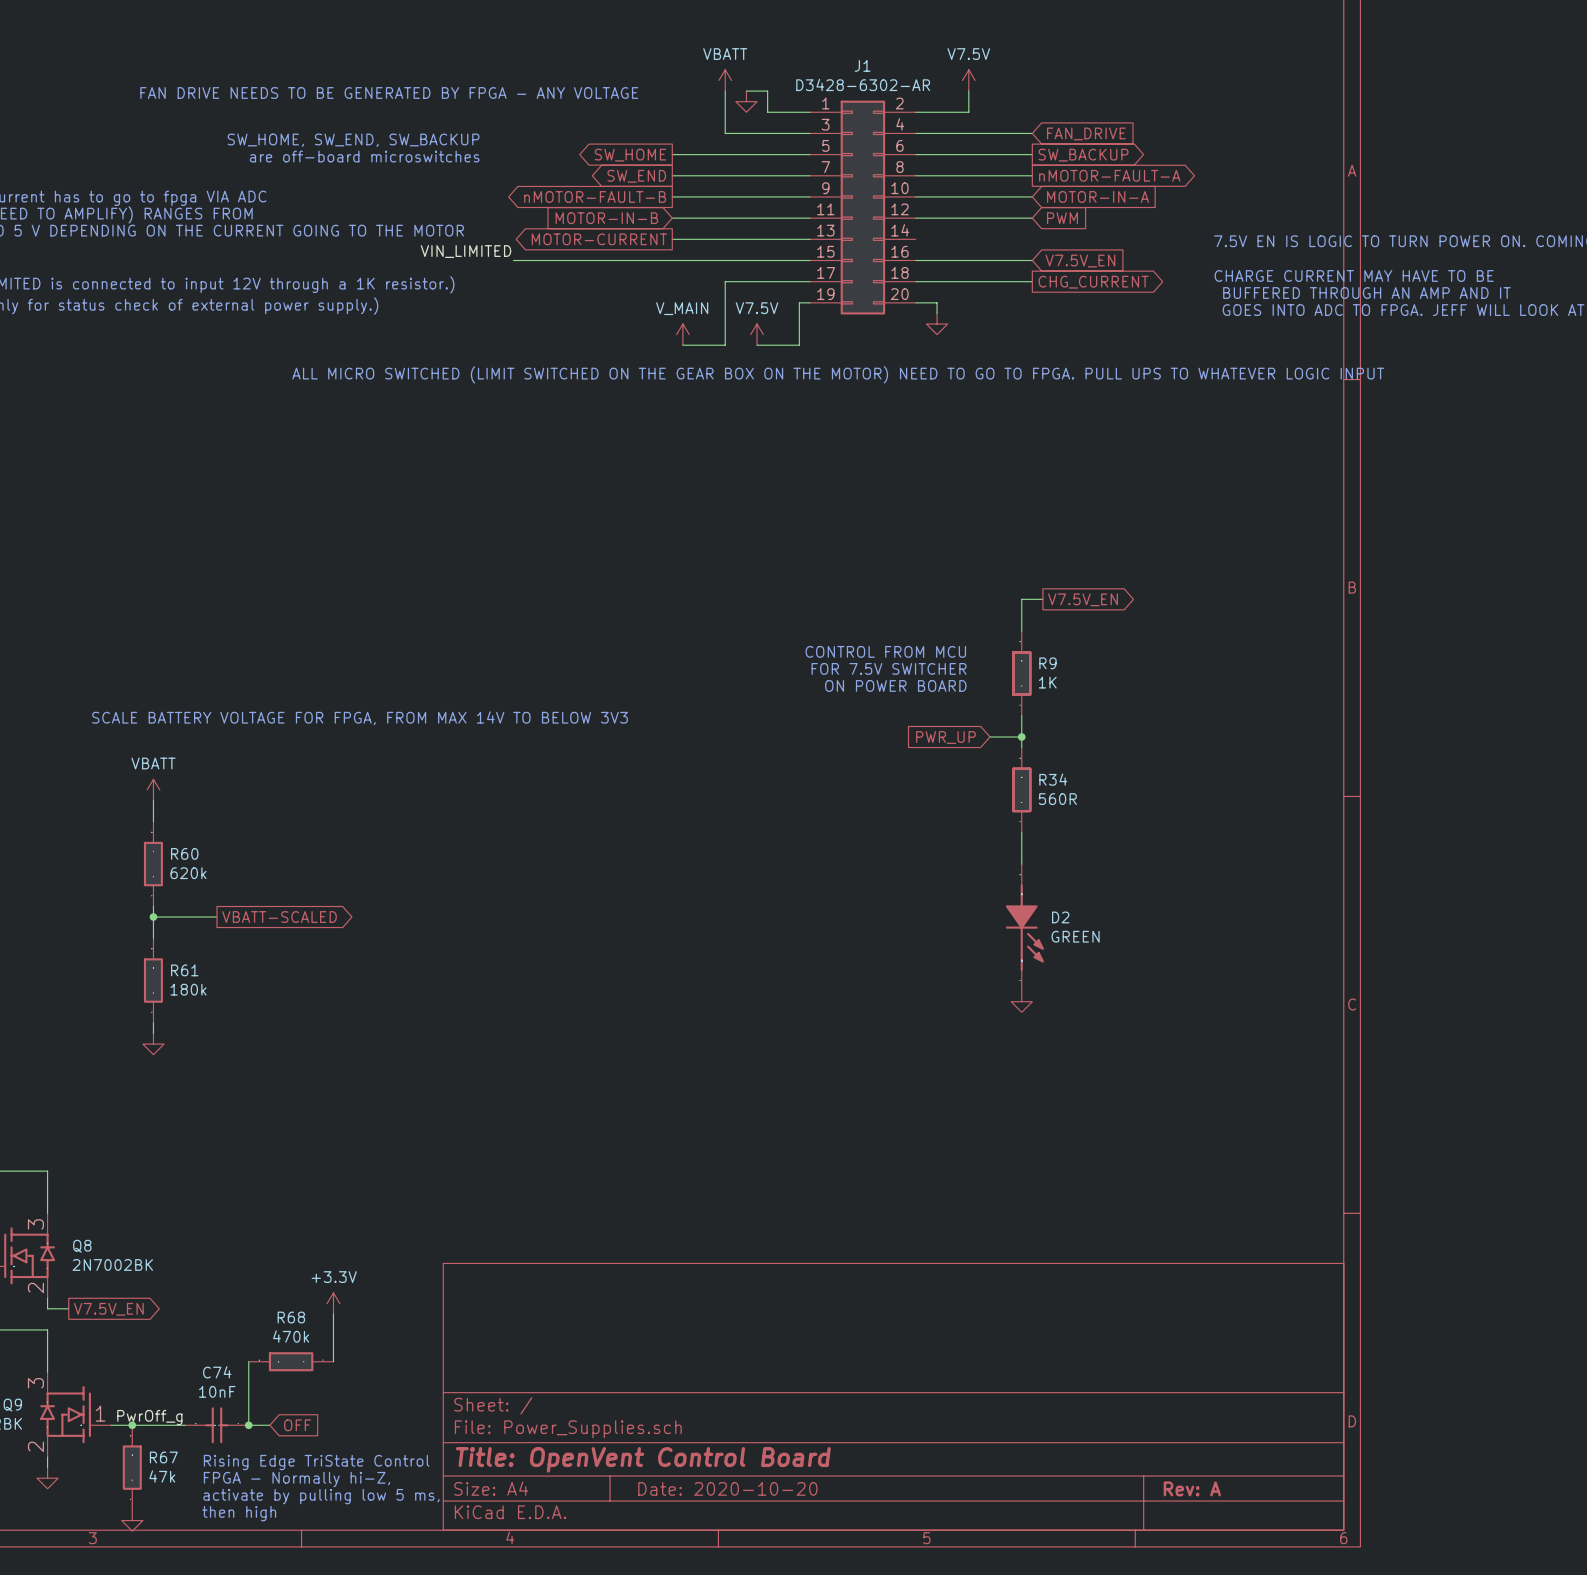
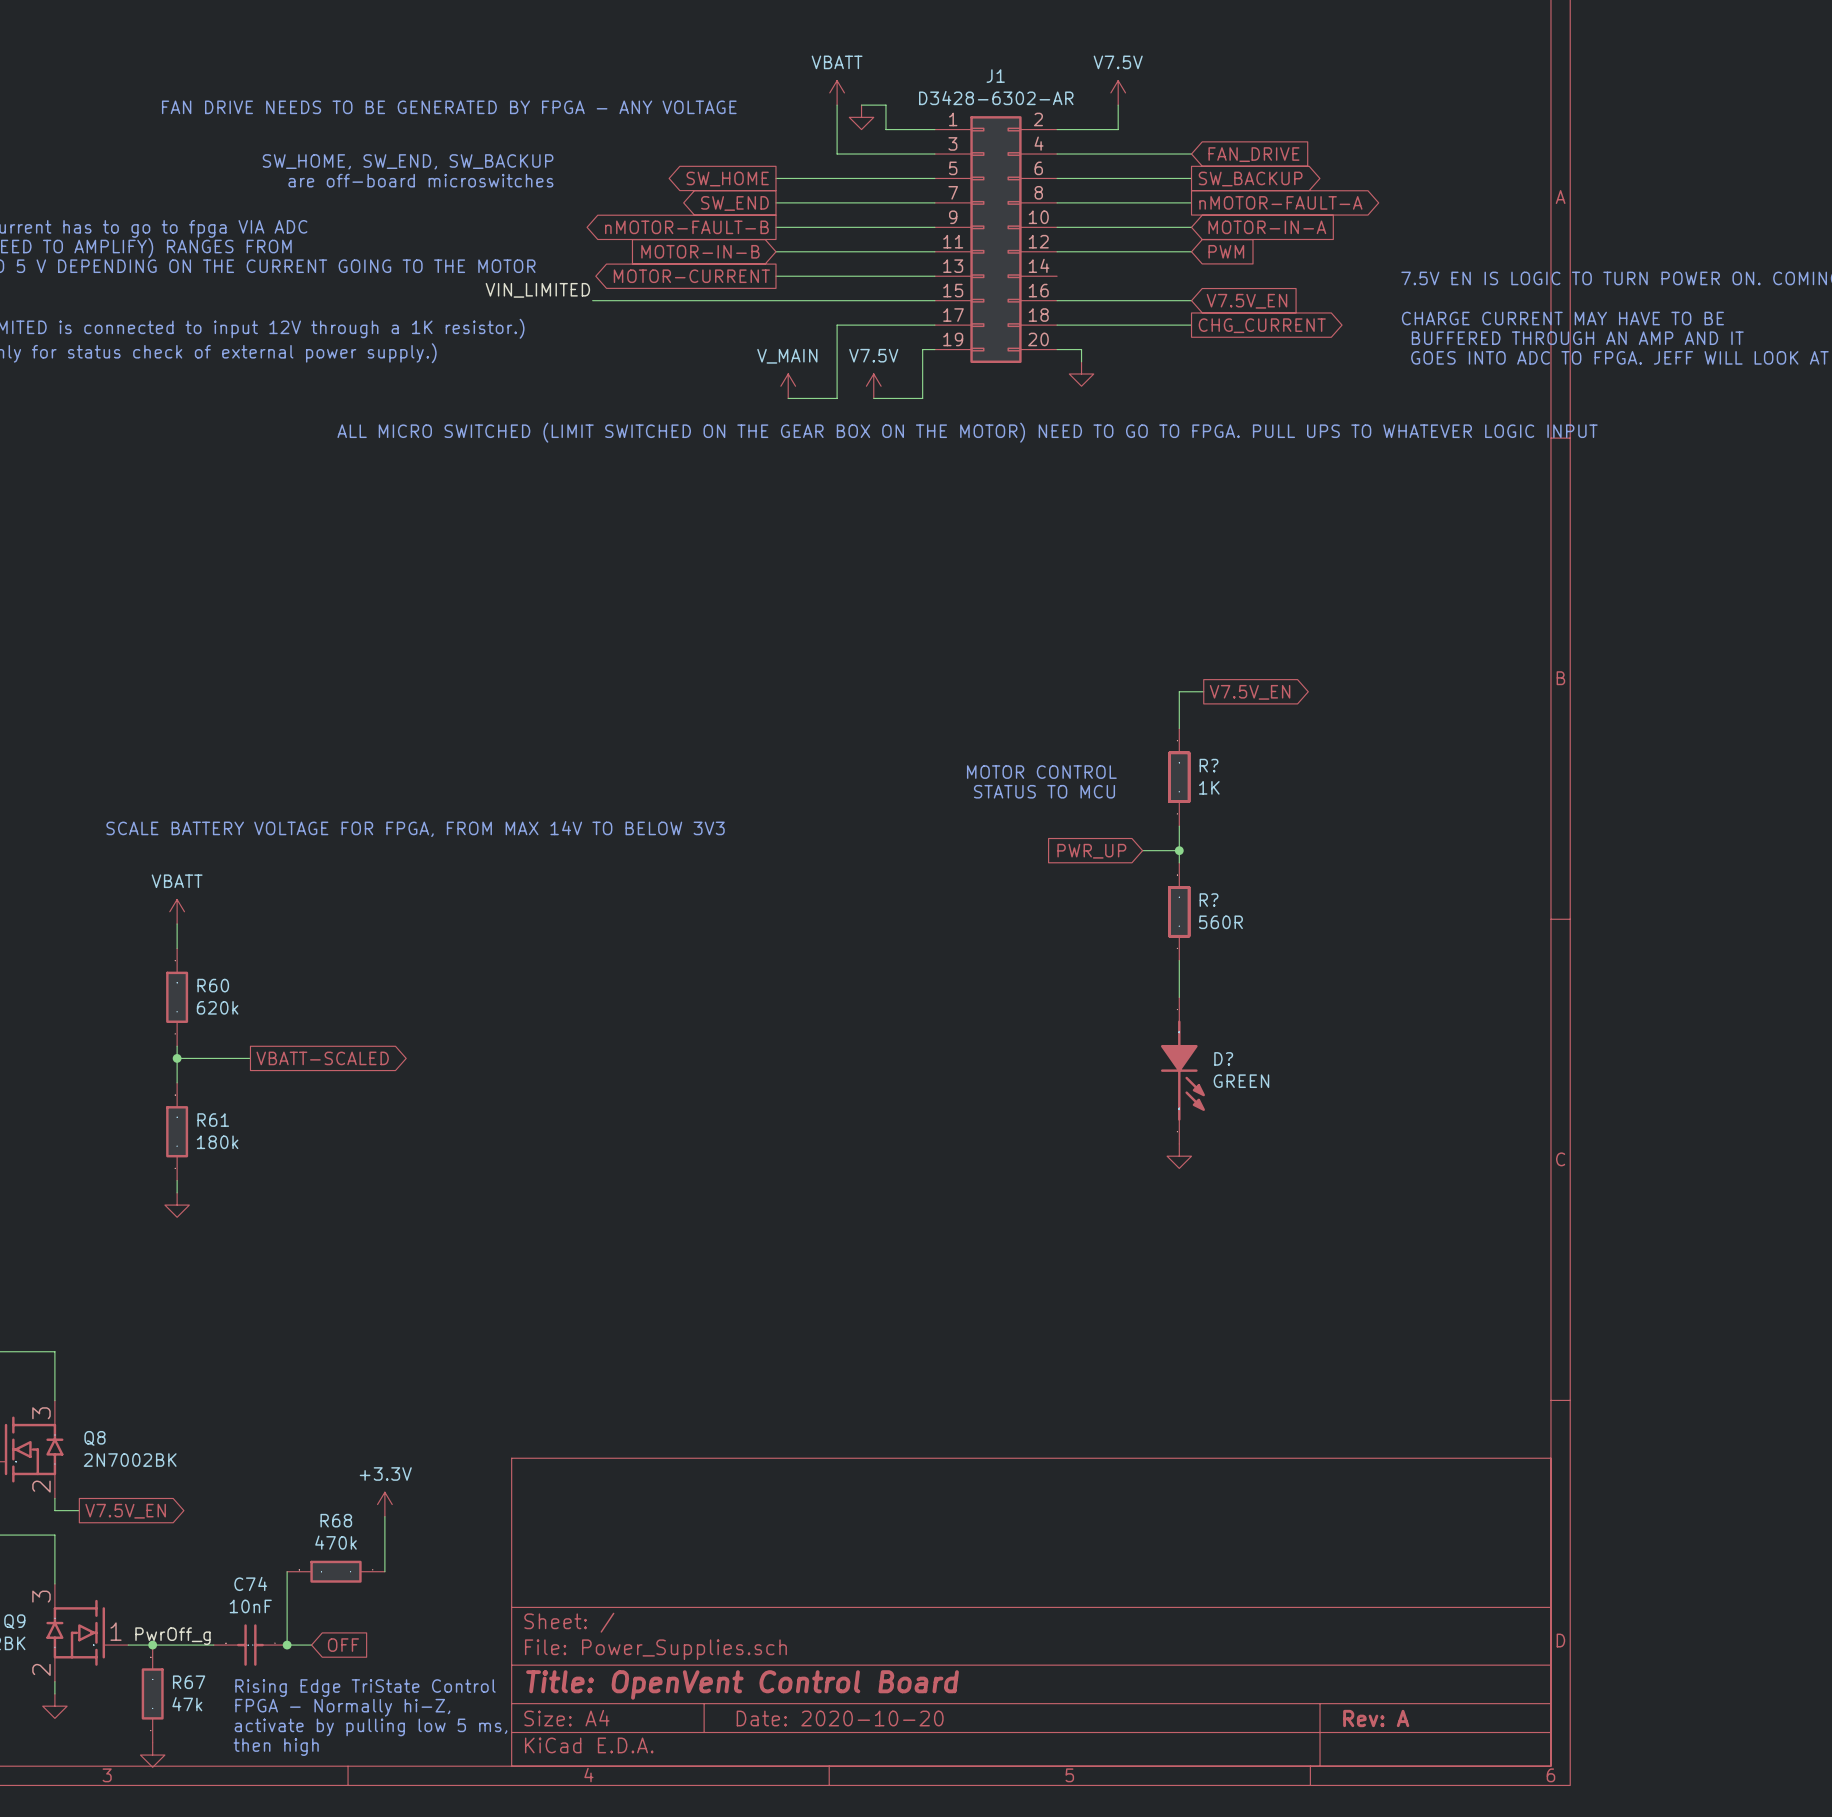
text: CONTROL FROM MCU (885, 651) -> none
R9 name: R9 (1047, 663) -> R? (1209, 765)
text: FOR 7.5V SWITCHER (889, 668) -> MOTOR CONTROL (1041, 772)
text: ON POWER BOARD (895, 685) -> STATUS TO MCU (1044, 791)
R34 name: R34 (1053, 779) -> R? (1209, 900)
D2 name: D2 (1060, 917) -> D? (1223, 1058)

